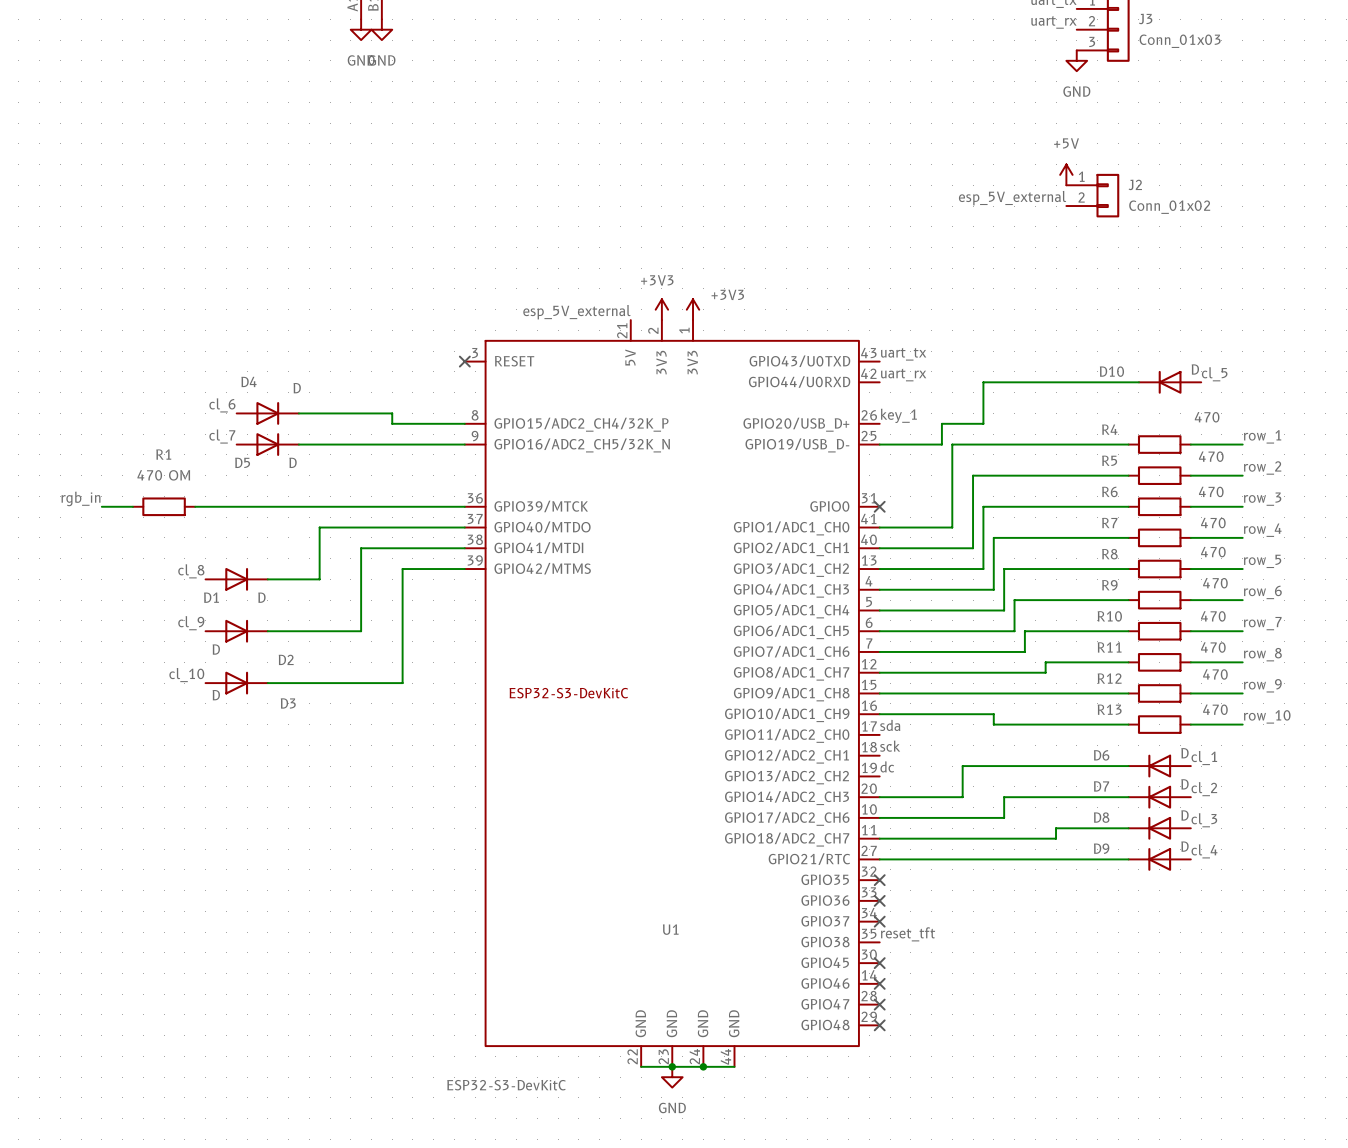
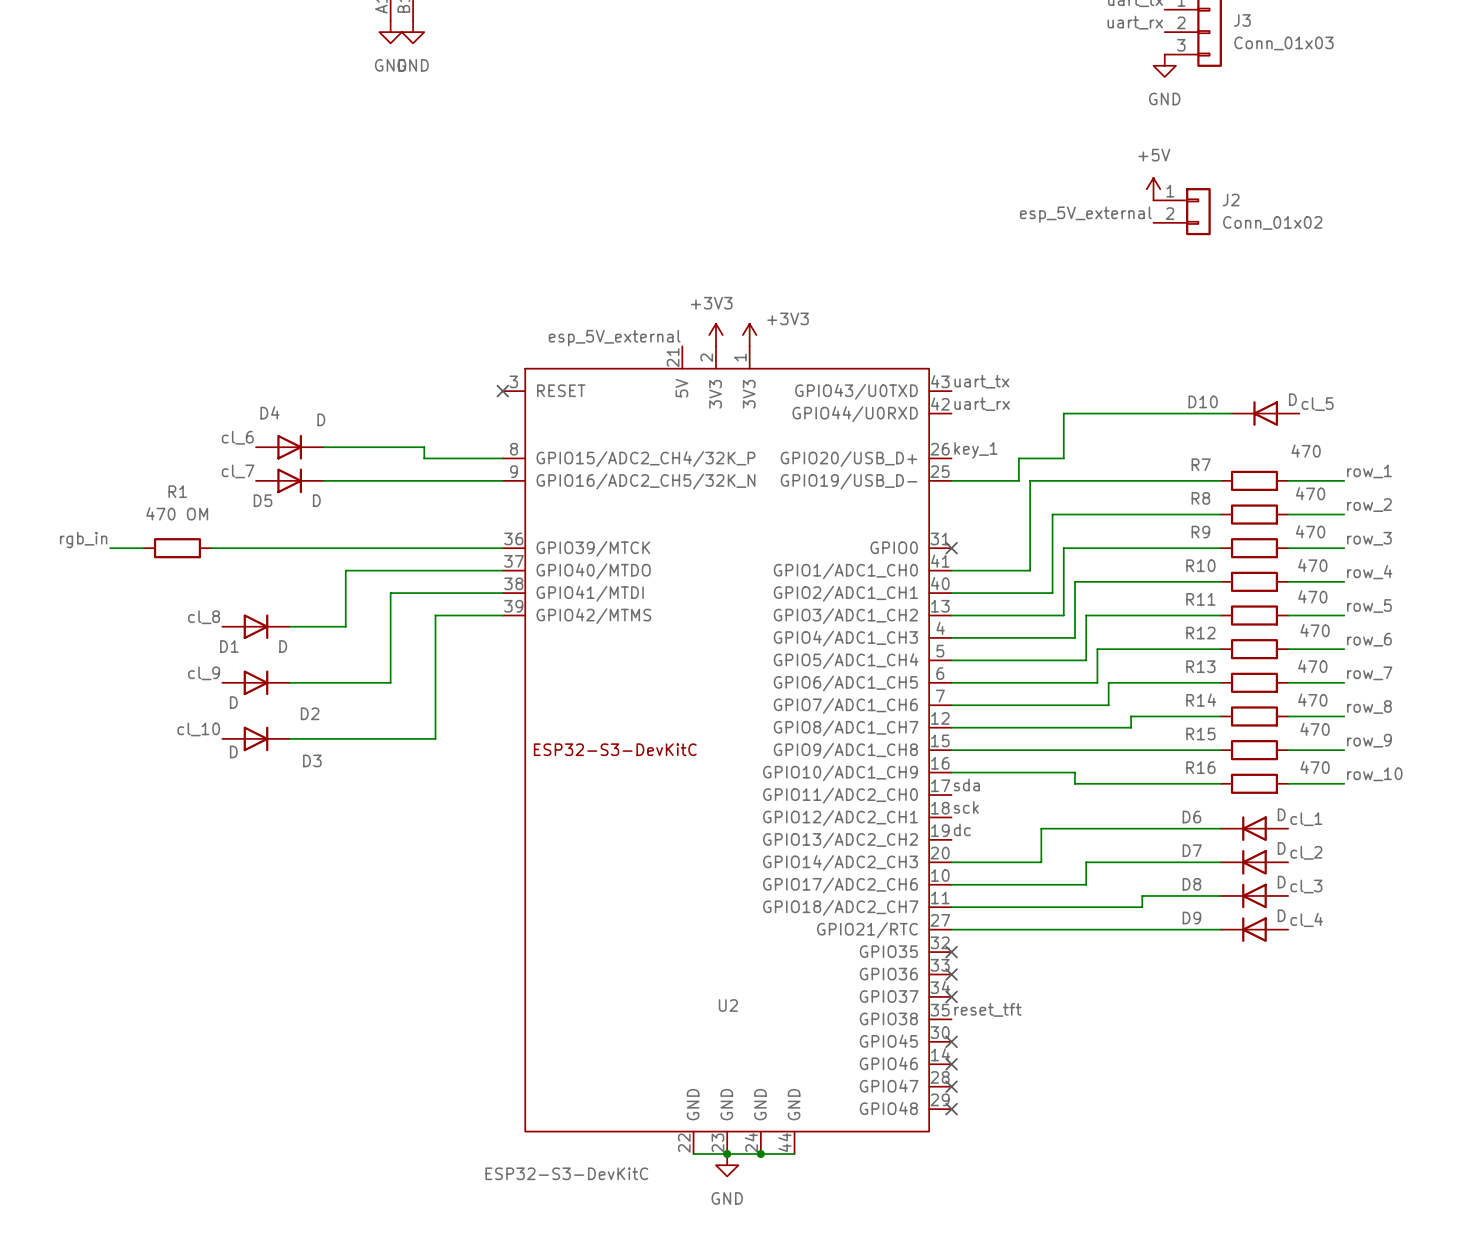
R4 name: R4 (1109, 429) -> R7 (1201, 464)
R5 name: R5 (1109, 460) -> R8 (1200, 498)
R6 name: R6 (1109, 491) -> R9 (1200, 532)
R7 name: R7 (1109, 523) -> R10 (1200, 565)
R8 name: R8 (1109, 554) -> R11 (1200, 599)
R9 name: R9 (1109, 585) -> R12 (1200, 633)
R10 name: R10 (1109, 616) -> R13 (1200, 666)
R11 name: R11 (1109, 647) -> R14 (1201, 700)
R12 name: R12 (1109, 678) -> R15 (1200, 734)
R13 name: R13 (1109, 709) -> R16 (1200, 767)
U1 name: U1 (670, 929) -> U2 (728, 1005)

